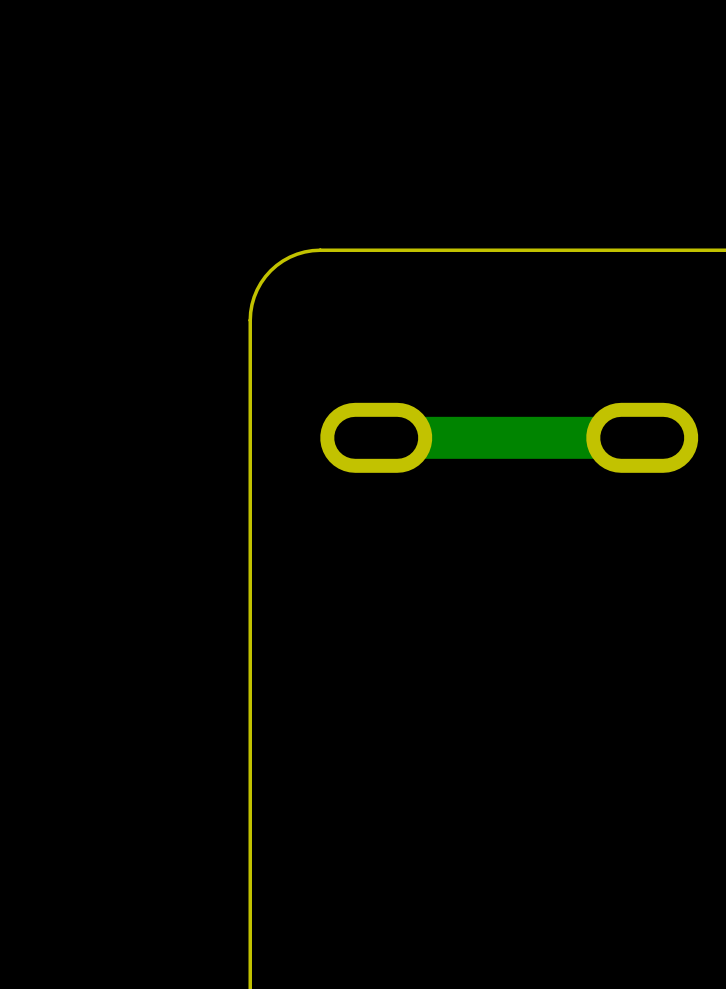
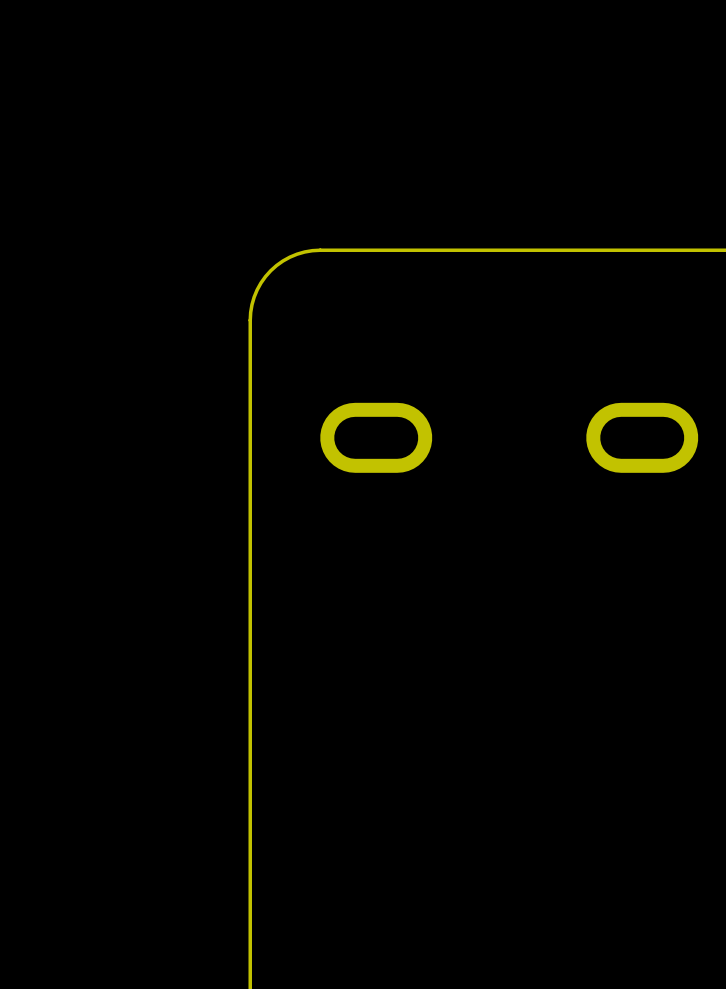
track: (642, 437) (376, 437) -> none

